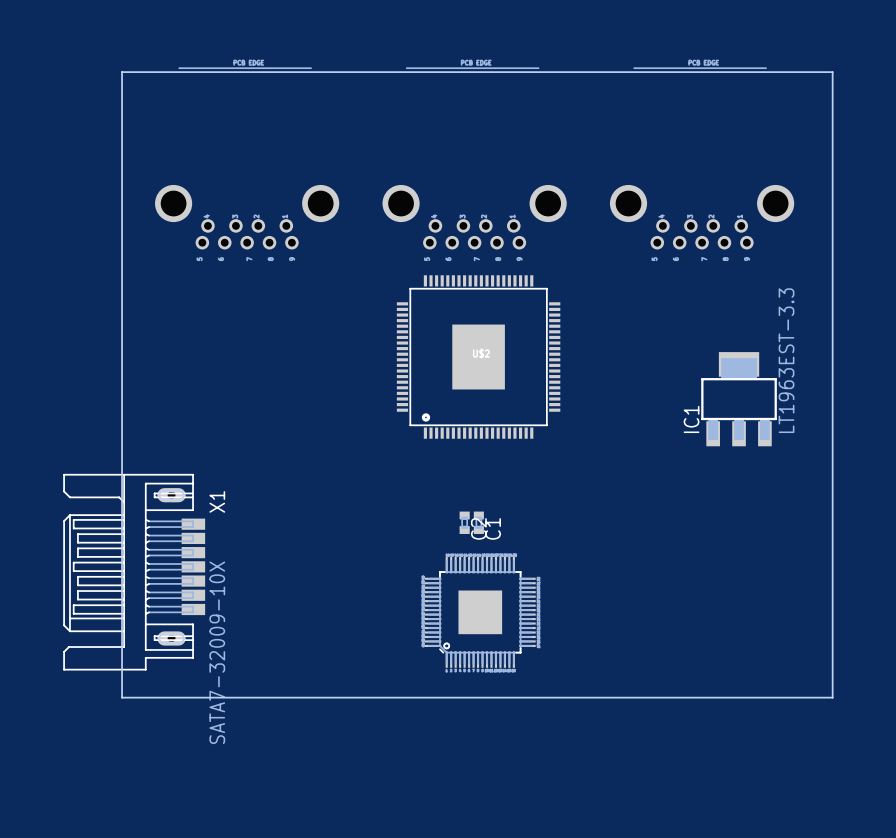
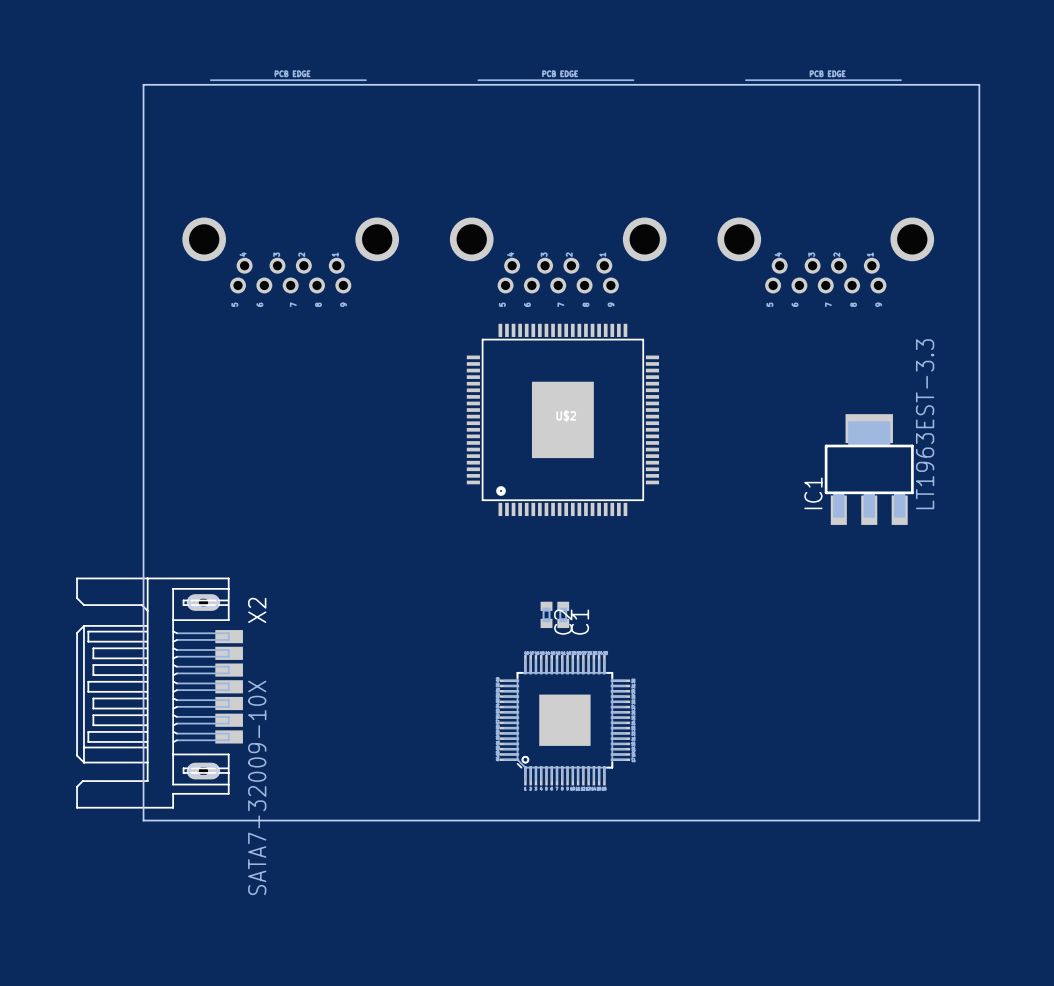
X1: SATA7-32009-10X (134, 572) -> none
X2: none -> SATA7-32009-10X (159, 693)

